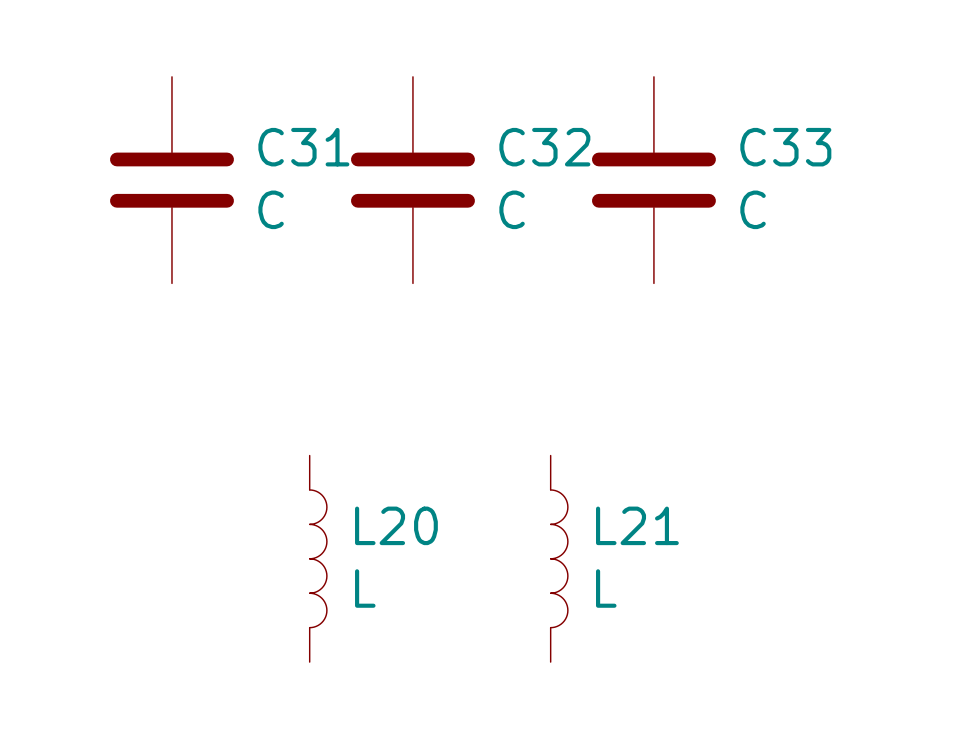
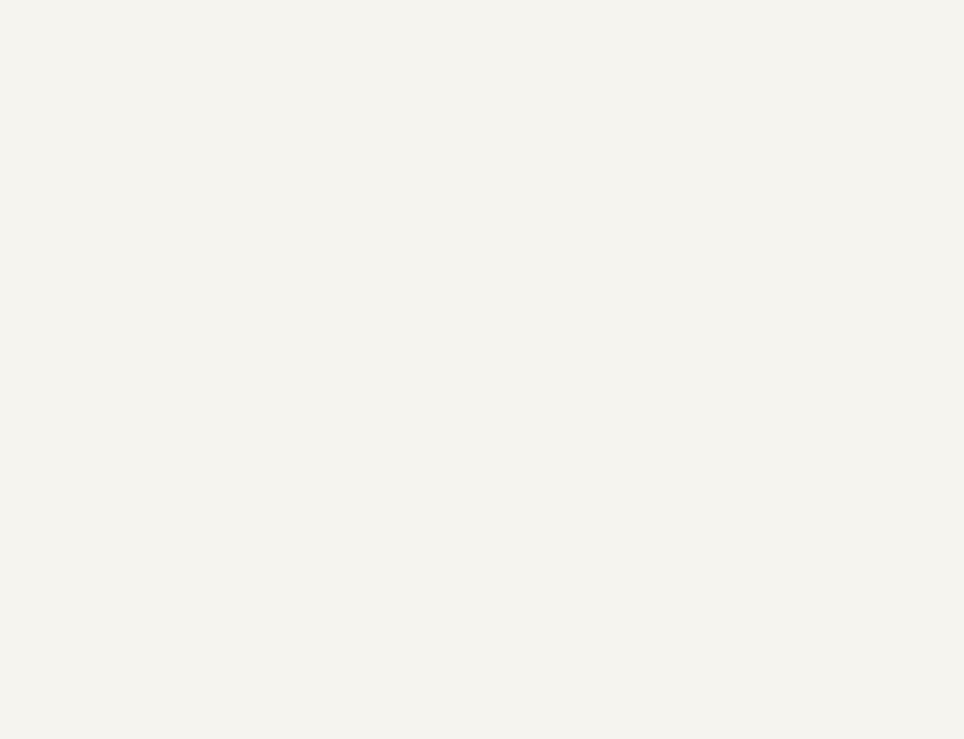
C31: C (171, 180) -> none
C32: C (412, 180) -> none
C33: C (653, 180) -> none
L20: L (318, 558) -> none
L21: L (559, 558) -> none

